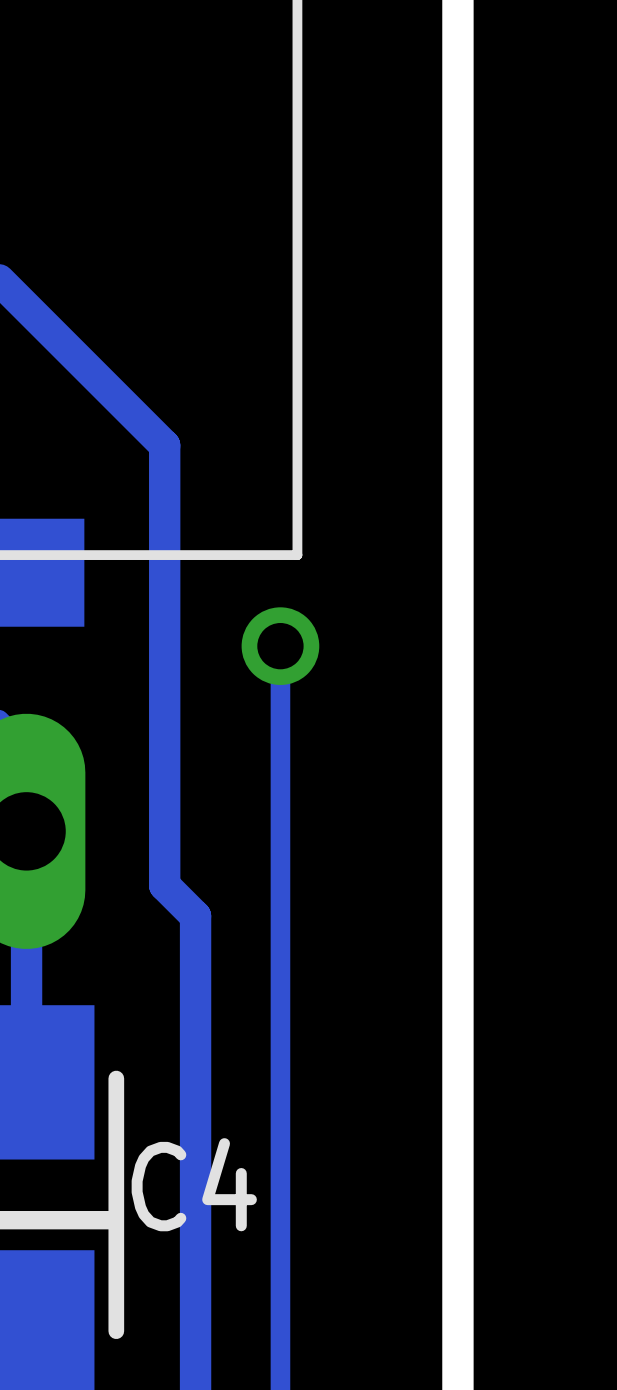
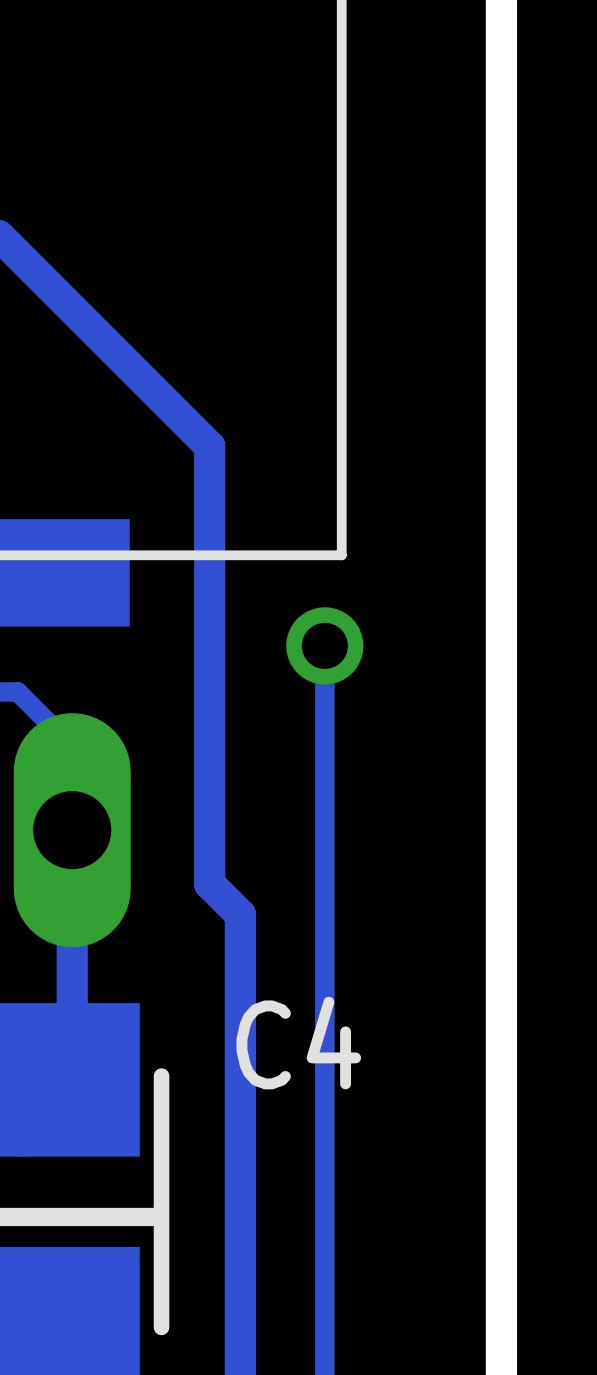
C4 name position: C4 (194, 1184) -> C4 (298, 1043)

